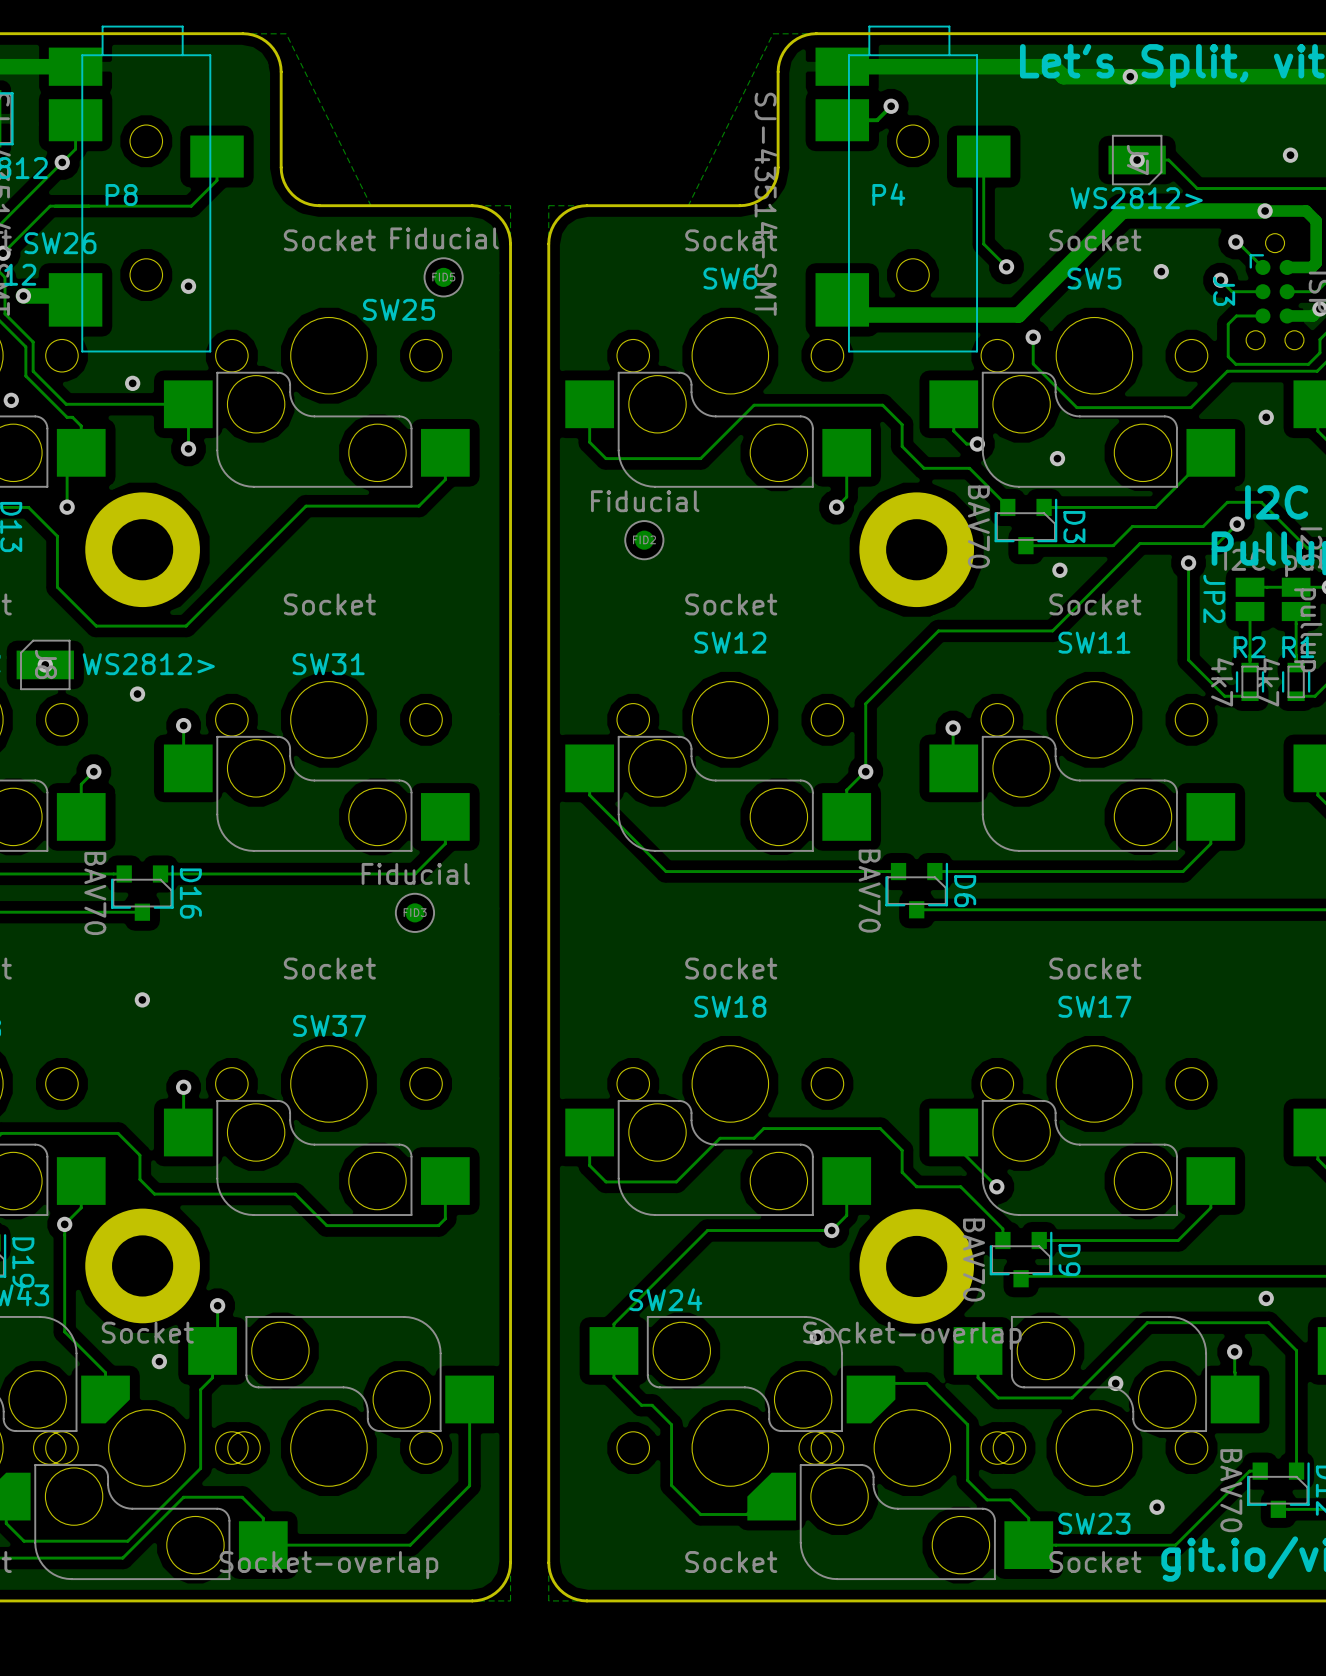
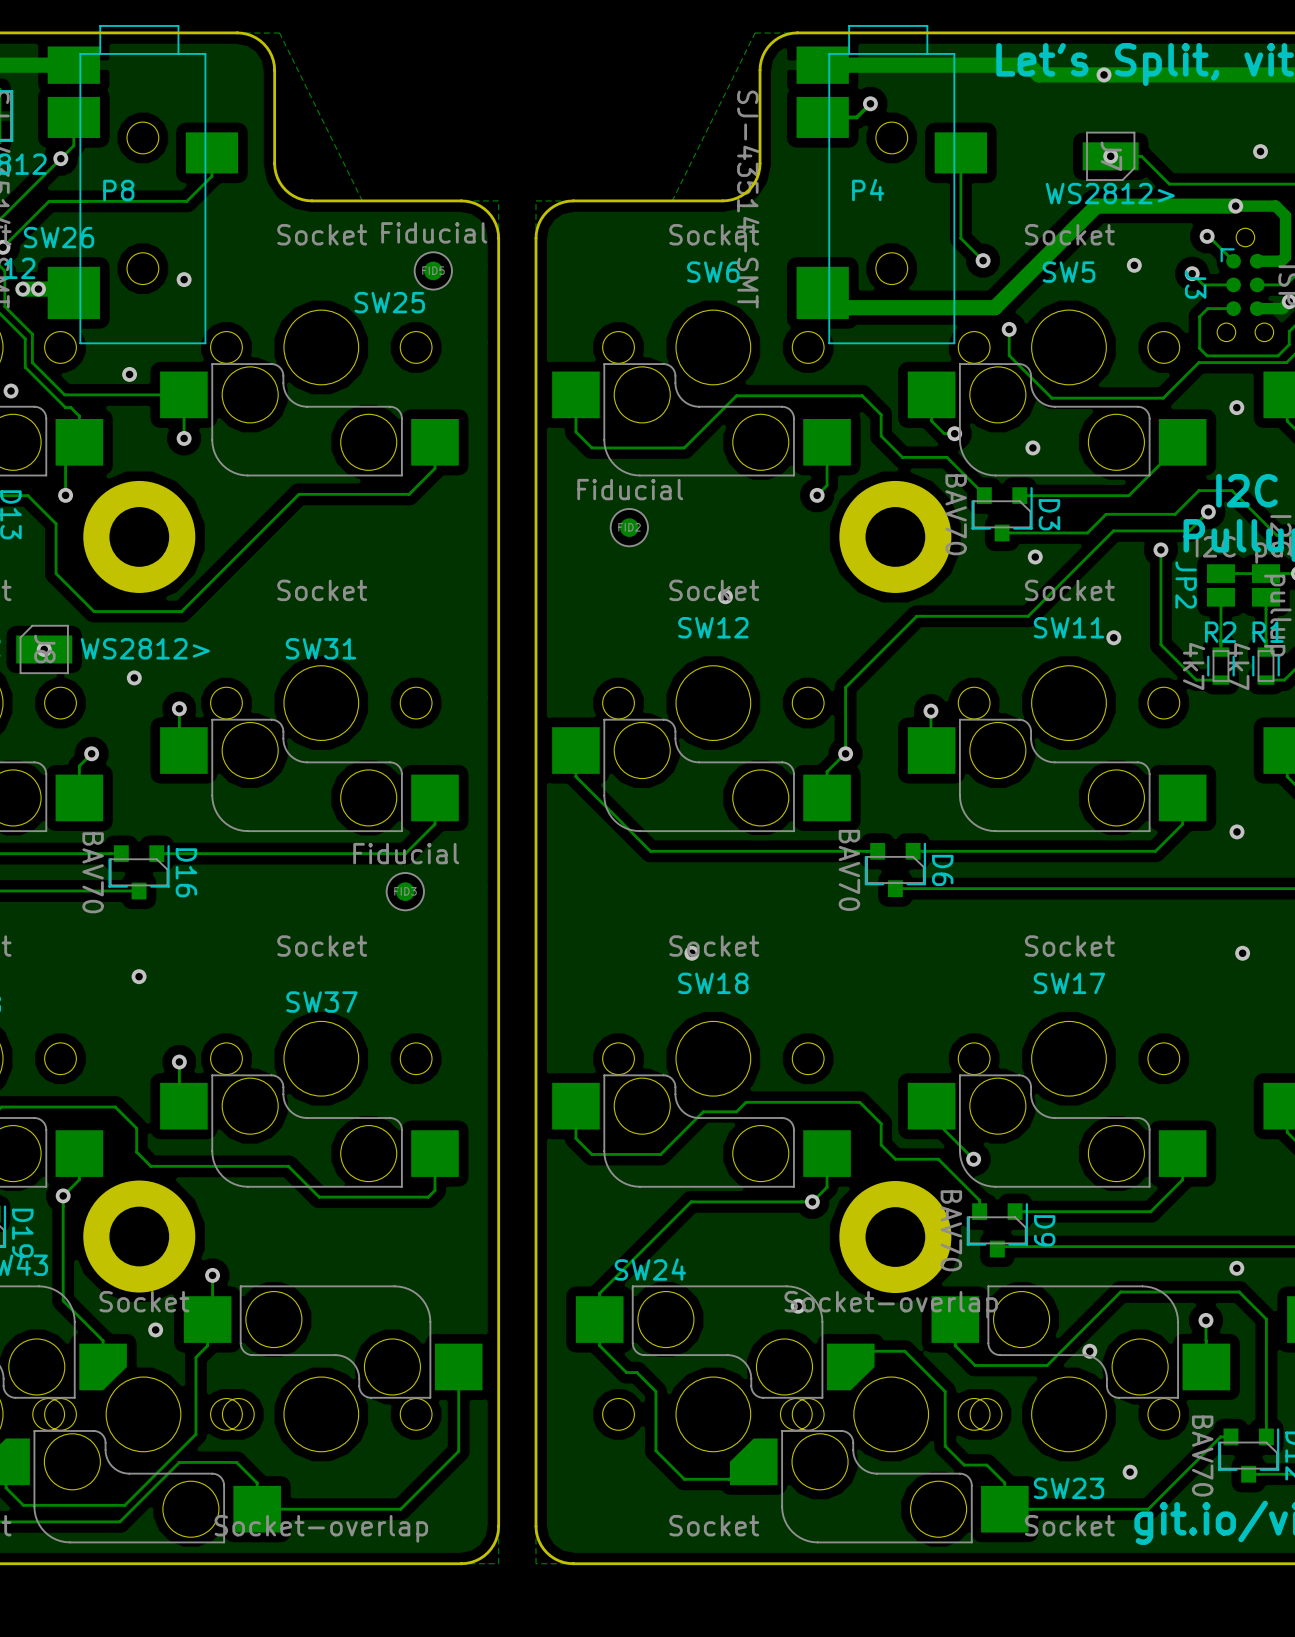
via: none -> (38, 289)
via: none -> (725, 596)
via: none -> (1113, 637)
via: none -> (1237, 831)
via: none -> (691, 953)
via: none -> (1242, 953)

